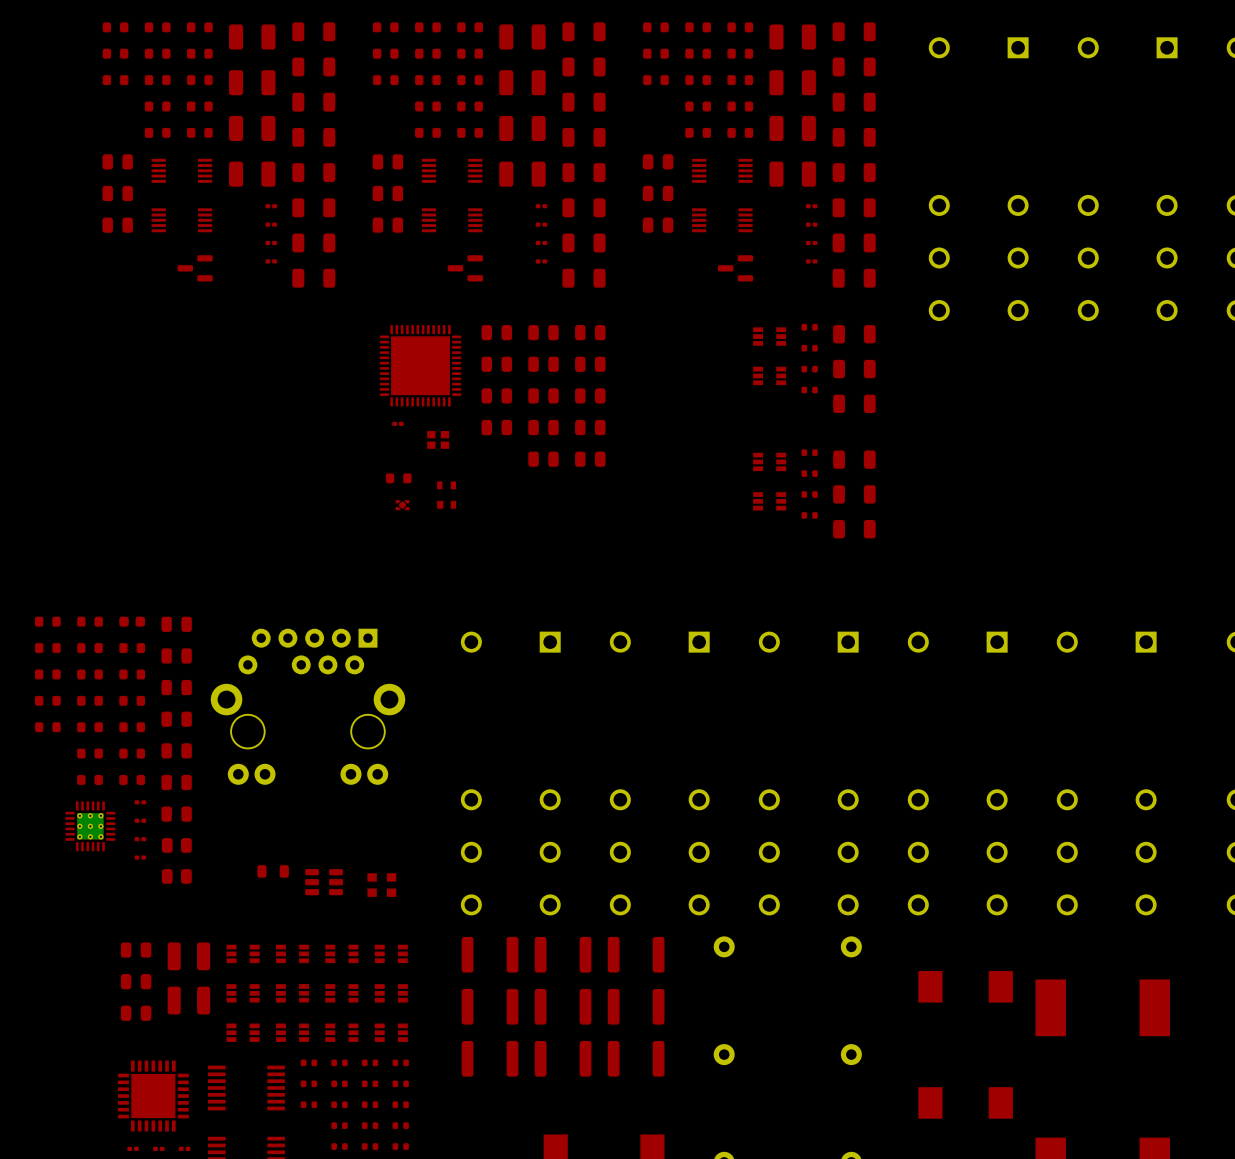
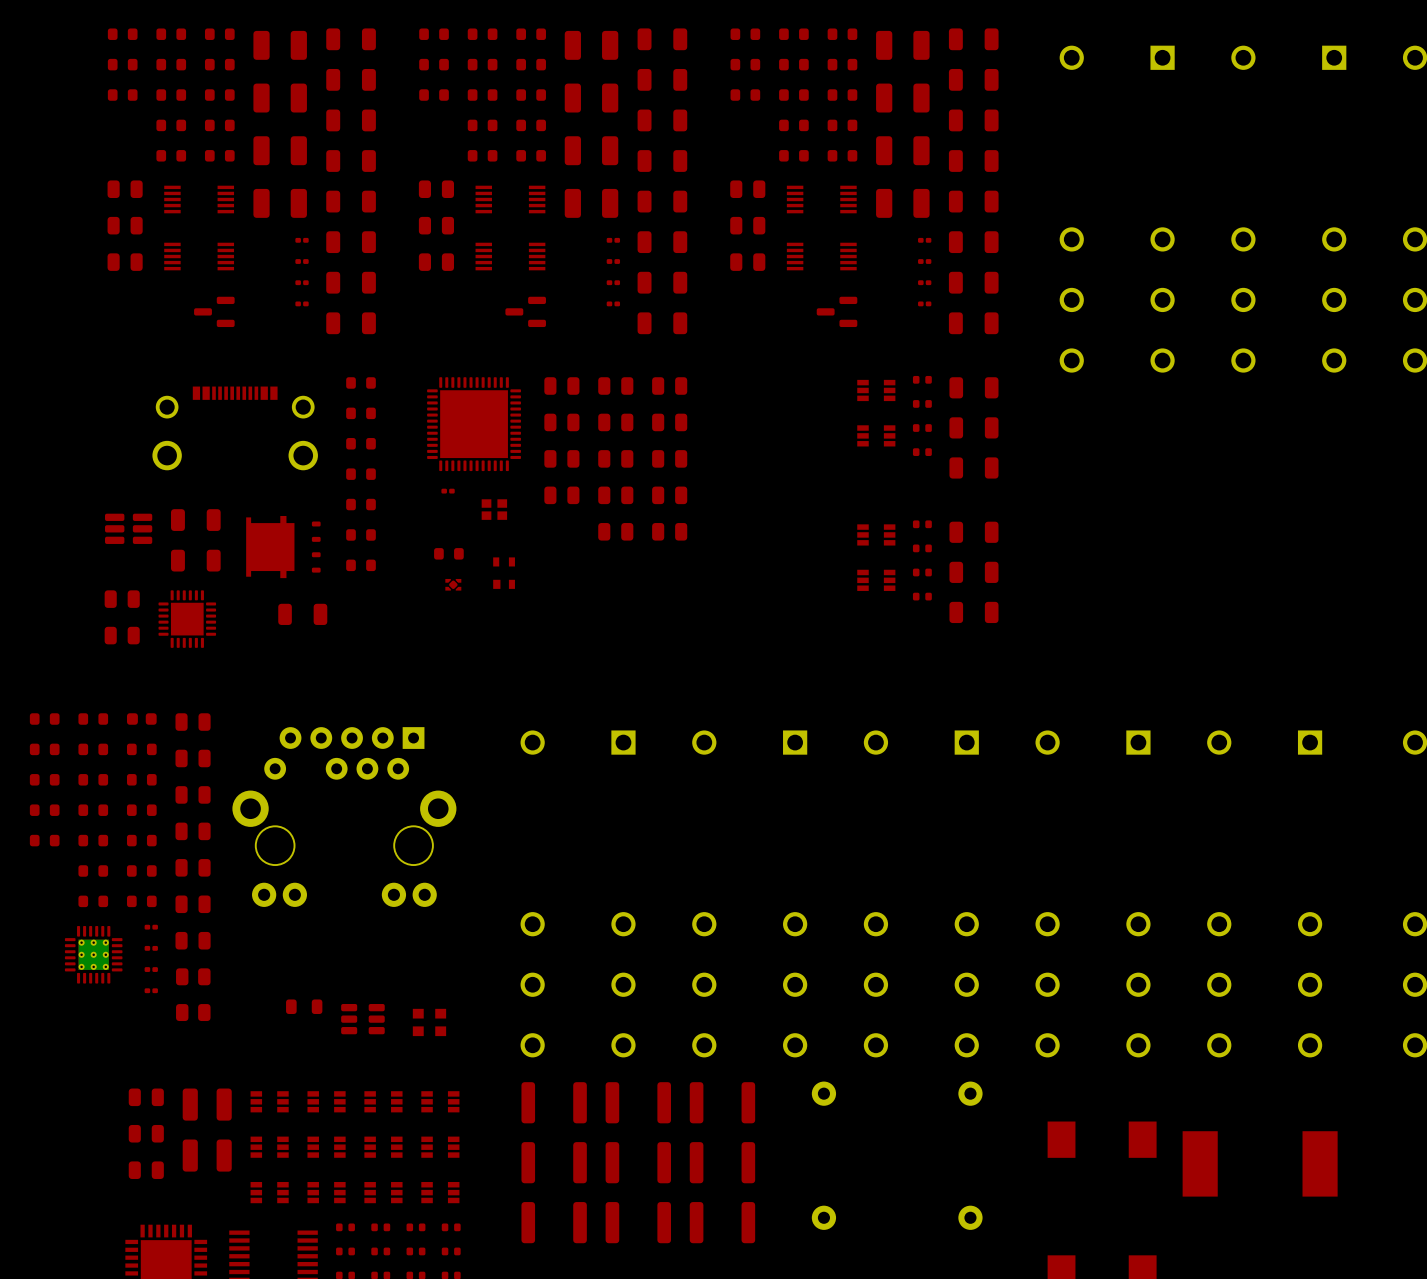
part: none -> (361, 382)
part: none -> (361, 413)
part: none -> (235, 428)
part: none -> (361, 443)
part: none -> (361, 474)
part: none -> (361, 504)
part: none -> (195, 520)
part: none -> (128, 528)
part: none -> (361, 534)
part: none -> (283, 547)
part: none -> (195, 560)
part: none -> (361, 565)
part: none -> (122, 599)
part: none -> (302, 614)
part: none -> (187, 619)
part: none -> (122, 635)

